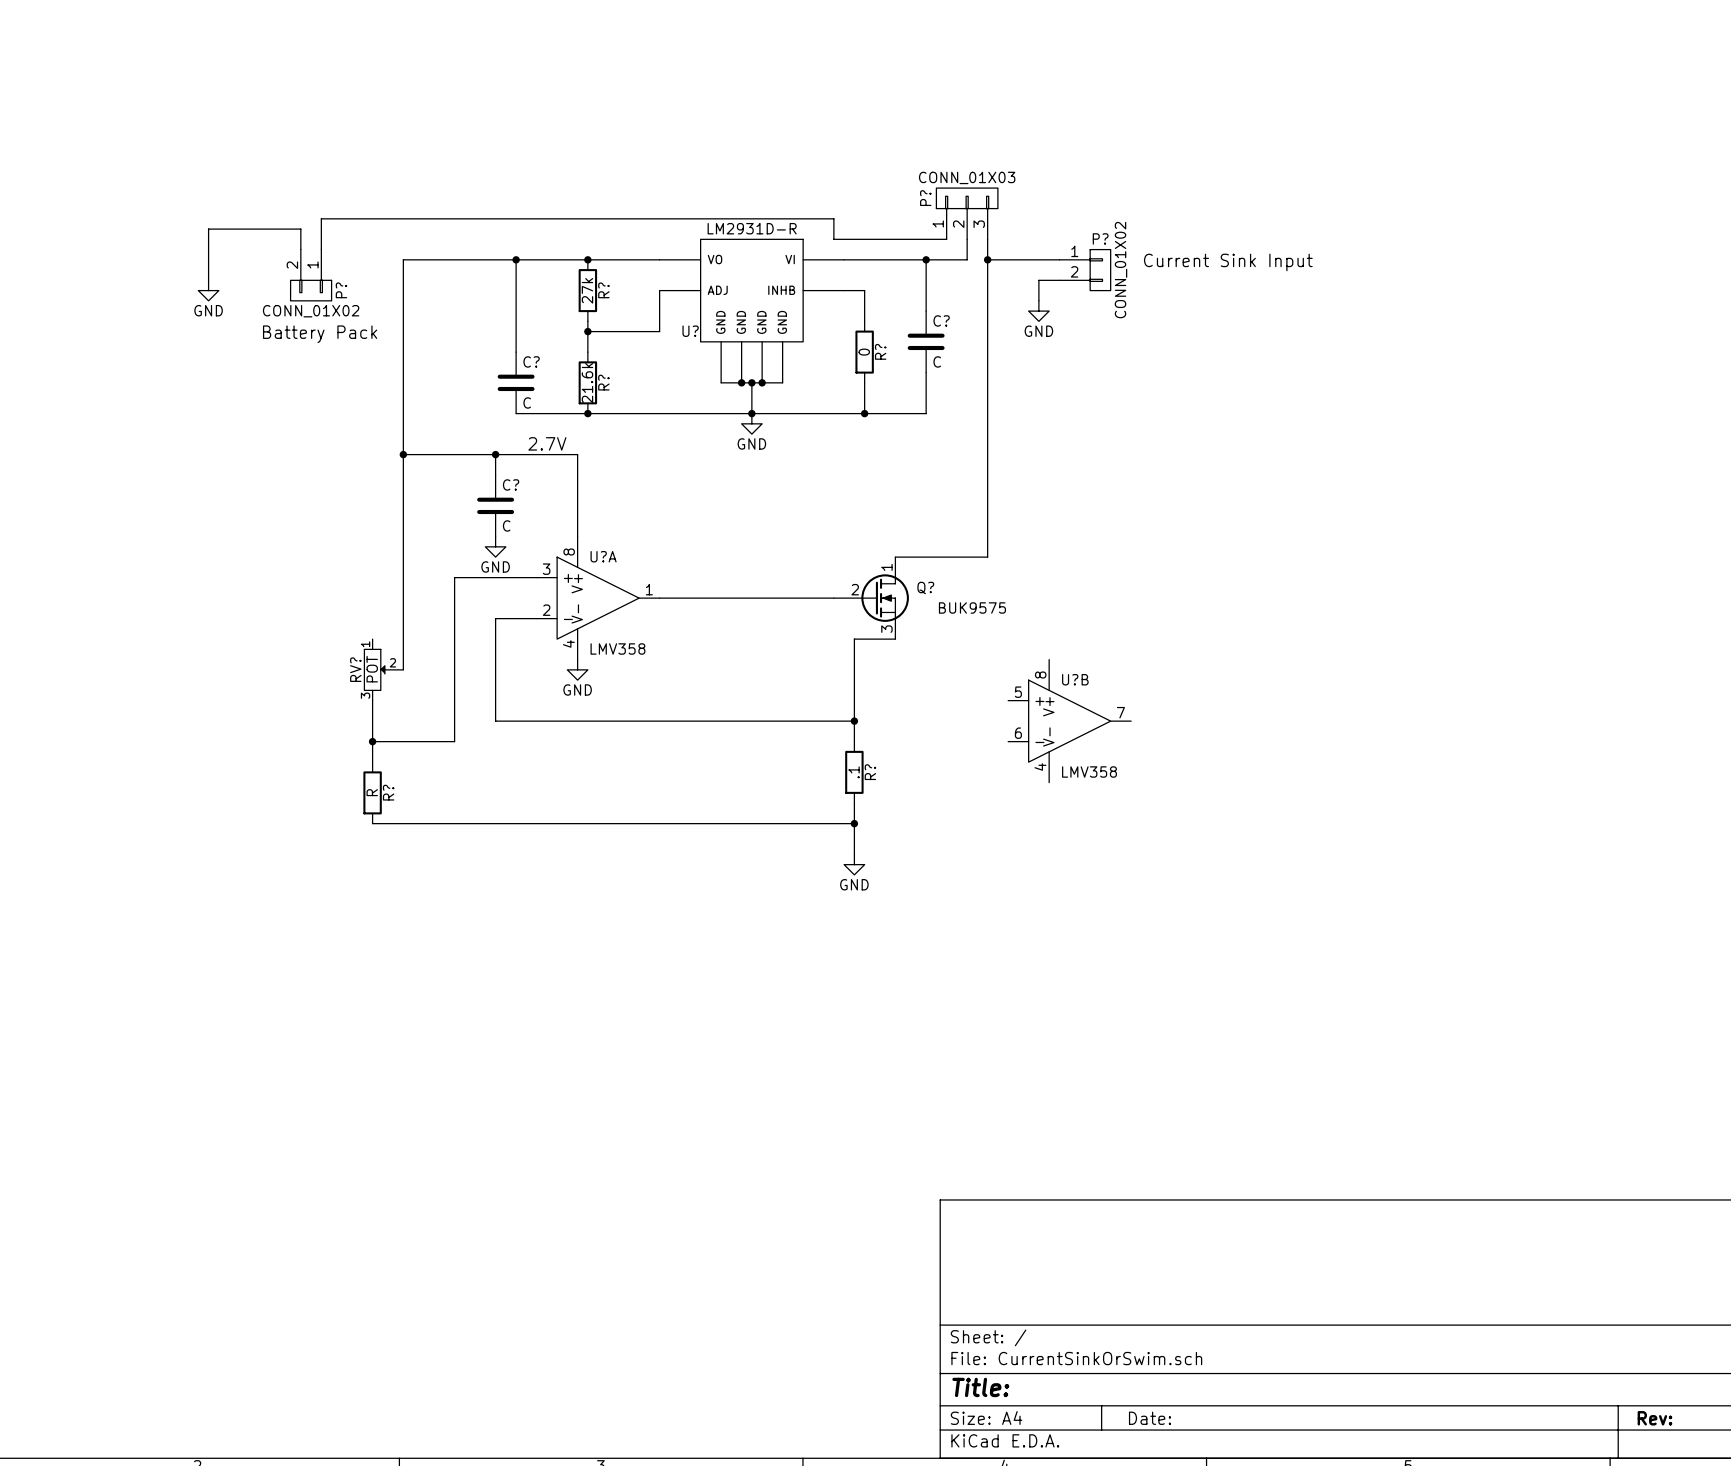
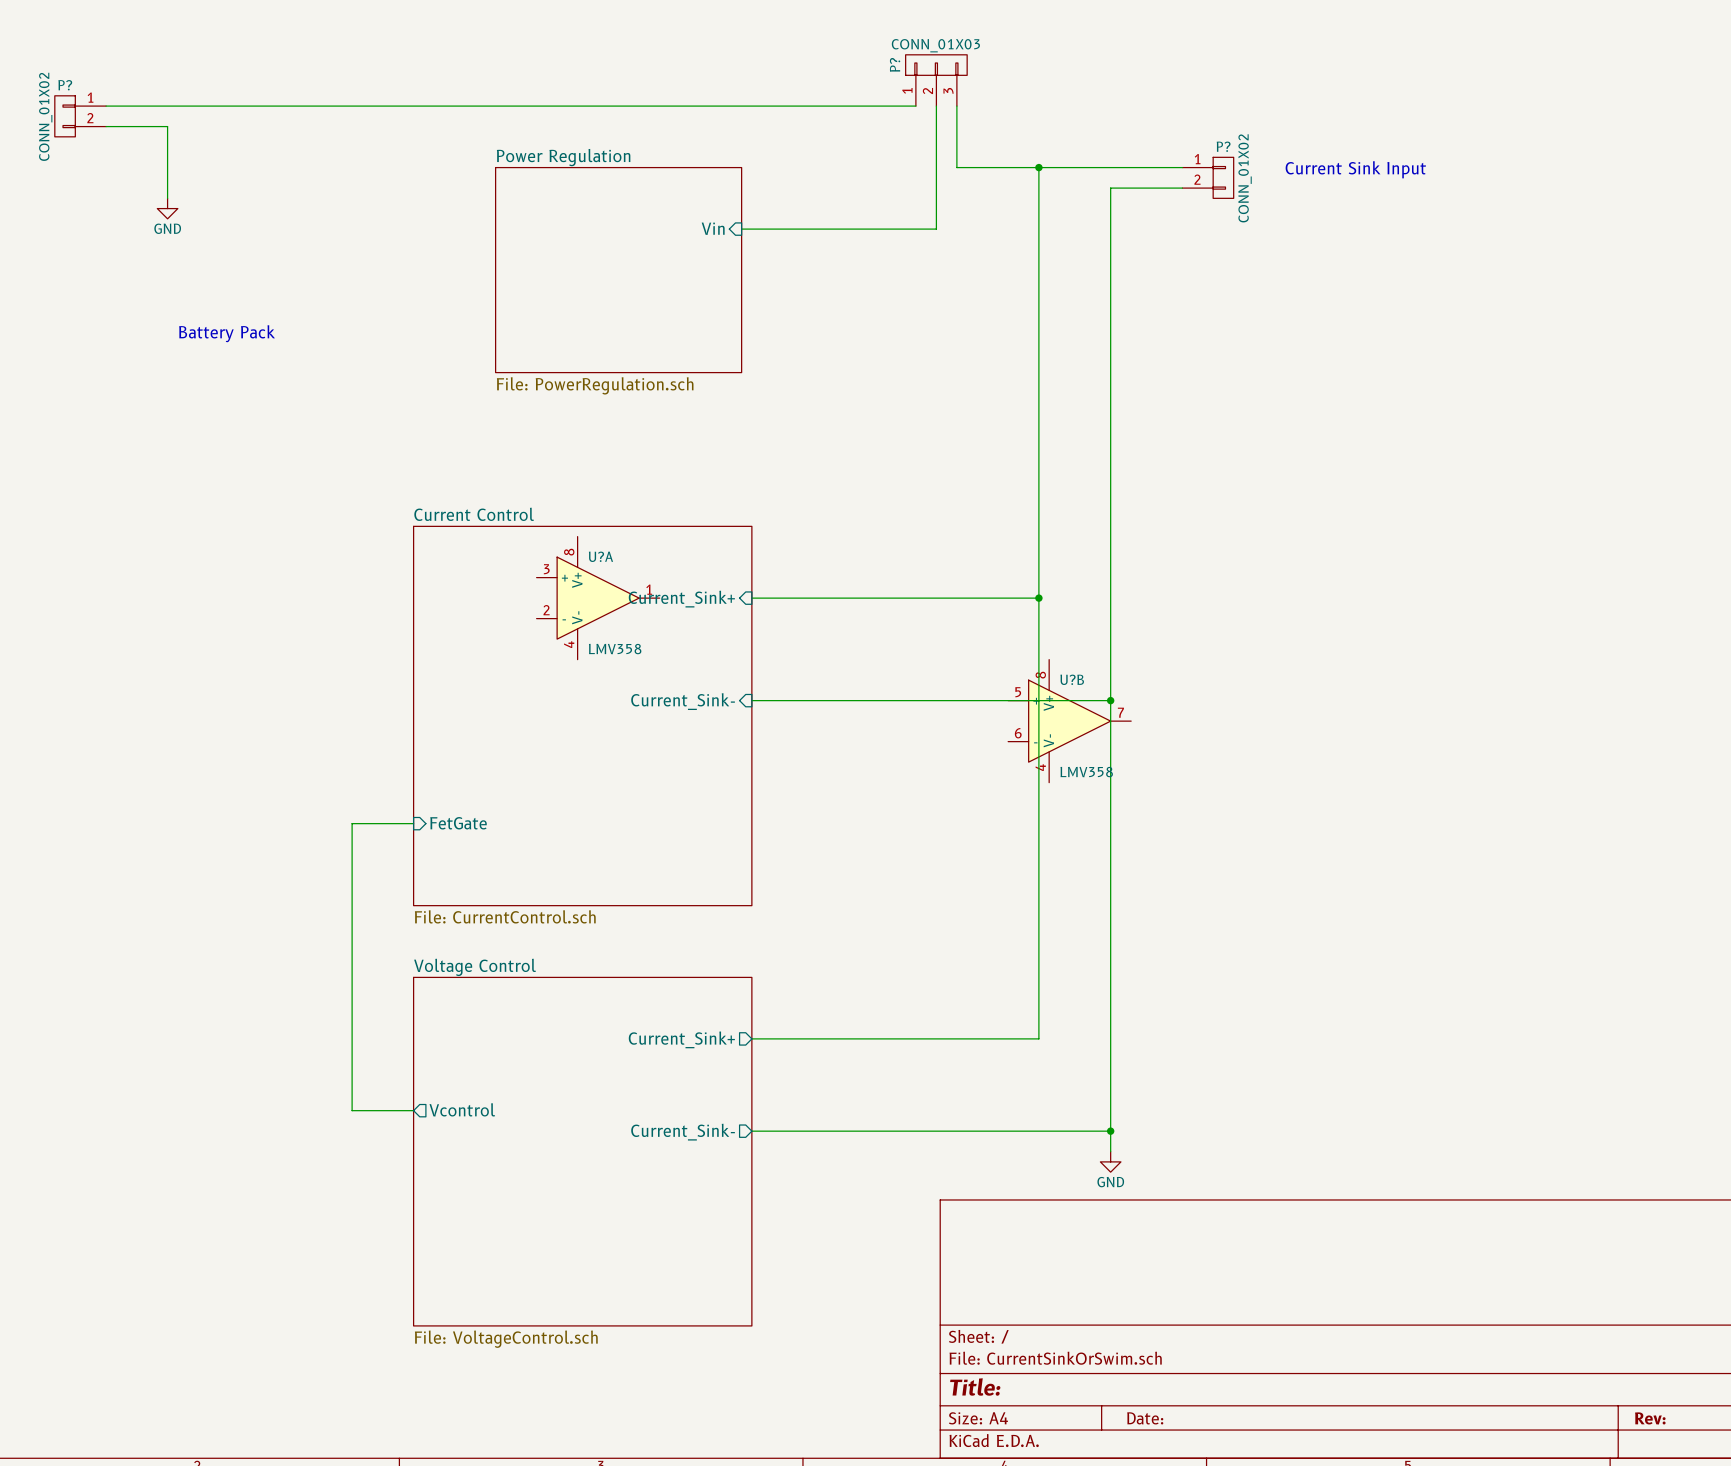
wire: none -> (106, 106) (915, 106)
wire: none -> (936, 106) (936, 229) (741, 229)
wire: none -> (956, 106) (956, 167) (1182, 167)
P?: none -> CONN_01X02 (80, 116)
wire: none -> (106, 126) (167, 126) (167, 198)
junction: none -> (1038, 167)
wire: none -> (1182, 188) (1110, 188) (1110, 1151)
P? position: (967, 213) -> (936, 80)
sheet pin: none -> Vin (713, 228)
wire: (946, 239) (833, 239) (833, 218) (321, 218) (321, 249) -> none
wire: (967, 239) (967, 259) (844, 259) -> none
wire: (987, 239) (987, 557) (895, 557) -> none
wire: (300, 249) (300, 229) (208, 229) (208, 280) -> none
wire: (516, 259) (516, 352) -> none
junction: (516, 259) -> none
junction: (587, 259) -> none
wire: (659, 259) (403, 259) (403, 669) -> none
wire: (926, 259) (926, 311) -> none
junction: (926, 259) -> none
wire: (987, 259) (1059, 259) -> none
junction: (987, 259) -> none
text position: Current Sink Input (1228, 262) -> Current Sink Input (1355, 169)
sheet Power Regulation: none -> File: PowerRegulation.sch (618, 270)
P? position: (1085, 270) -> (1208, 177)
P?: CONN_01X02 (311, 275) -> none
wire: (1038, 280) (1059, 280) -> (1038, 280) (1038, 167)
power symbol position: GND (208, 290) -> GND (167, 208)
R?: 27k (587, 290) -> none
wire: (659, 290) (659, 331) (587, 331) -> none
wire: (844, 290) (864, 290) (864, 321) -> none
wire: none -> (1038, 300) (1038, 1038) (751, 1038)
U?: LM2931D-R (751, 311) -> none
power symbol: GND (1038, 311) -> none
wire: (587, 321) (587, 352) -> none
junction: (587, 331) -> none
text position: Battery Pack (320, 334) -> Battery Pack (227, 333)
C?: C (926, 341) -> none
R?: 0 (864, 352) -> none
wire: (926, 372) (926, 413) (516, 413) -> none
C?: C (516, 382) -> none
R?: 21.6k (587, 382) -> none
wire: (721, 382) (782, 382) -> none
junction: (741, 382) -> none
wire: (751, 382) (751, 413) -> none
junction: (751, 382) -> none
junction: (762, 382) -> none
wire: (864, 382) (864, 413) -> none
junction: (587, 413) -> none
junction: (751, 413) -> none
junction: (864, 413) -> none
power symbol: GND (751, 423) -> none
label: 2.7V (547, 443) -> none
wire: (403, 454) (577, 454) (577, 536) -> none
junction: (403, 454) -> none
wire: (495, 454) (495, 475) -> none
junction: (495, 454) -> none
C?: C (495, 505) -> none
power symbol: GND (495, 546) -> none
wire: (536, 577) (454, 577) (454, 741) (372, 741) -> none
wire: (659, 598) (751, 598) -> none
sheet pin: none -> Current_Sink+ (681, 599)
wire: none -> (833, 598) (1038, 598)
Q?: BUK9575 (871, 598) -> none
junction: none -> (1038, 598)
wire: (536, 618) (495, 618) (495, 721) (854, 721) -> none
wire: (895, 639) (854, 639) (854, 741) -> none
RV?: POT (383, 669) -> none
power symbol: GND (577, 669) -> none
wire: (372, 700) (372, 762) -> none
sheet pin: none -> Current_Sink- (683, 701)
wire: none -> (751, 700) (1110, 700)
junction: none -> (1110, 700)
sheet Current Control: none -> File: CurrentControl.sch (582, 716)
junction: (854, 721) -> none
junction: (372, 741) -> none
R?: .1 (854, 772) -> none
R?: R (372, 792) -> none
wire: (854, 803) (854, 854) -> none
wire: none -> (372, 823) (352, 823) (352, 1110) (413, 1110)
wire: (413, 823) (854, 823) -> none
sheet pin: none -> FetGate (458, 823)
junction: (854, 823) -> none
power symbol: GND (854, 864) -> none
sheet pin: none -> Current_Sink+ (681, 1039)
sheet pin: none -> Vcontrol (462, 1109)
sheet pin: none -> Current_Sink- (683, 1132)
wire: none -> (751, 1131) (1110, 1131)
junction: none -> (1110, 1131)
sheet Voltage Control: none -> File: VoltageControl.sch (582, 1151)
power symbol: none -> GND (1110, 1161)

